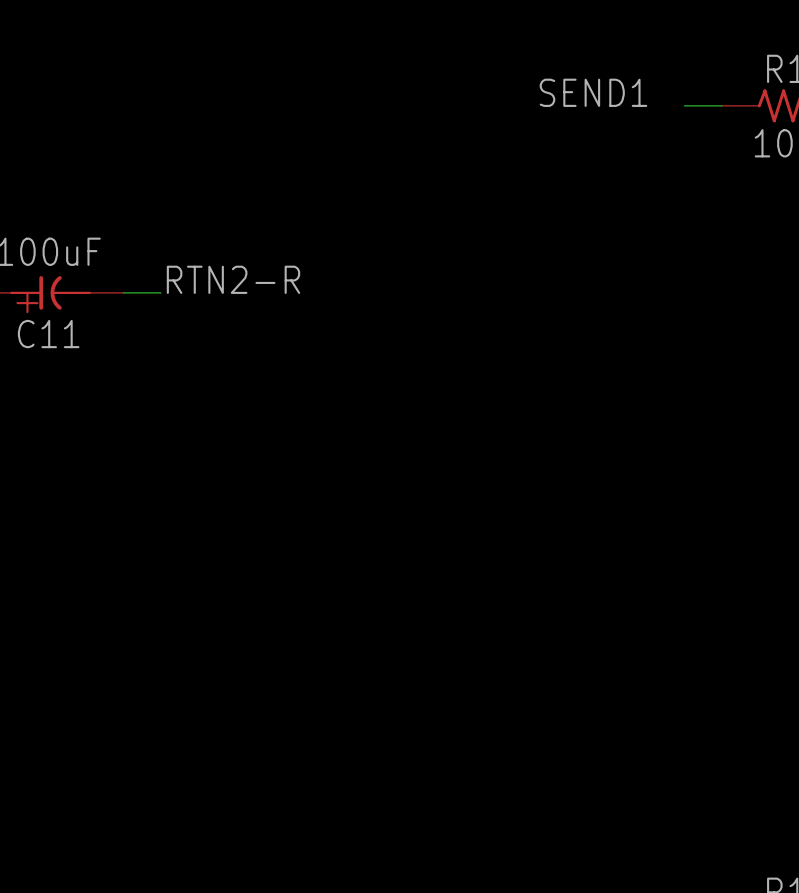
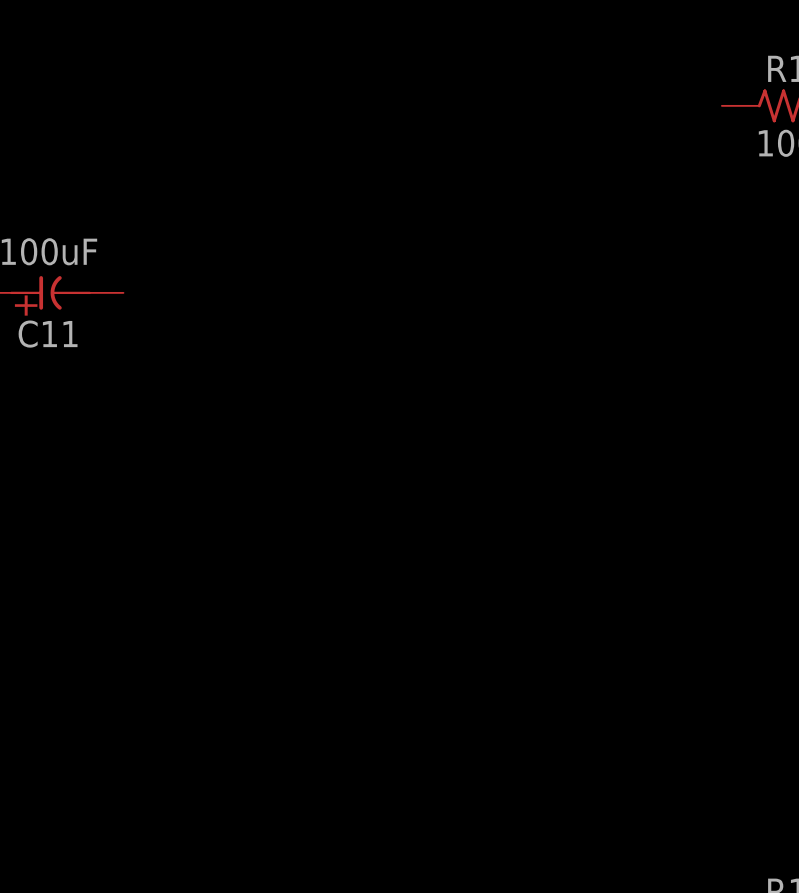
label: SEND1 (593, 92) -> none
wire: (684, 105) (721, 105) -> none
label: RTN2-R (233, 279) -> none
wire: (123, 292) (160, 292) -> none

